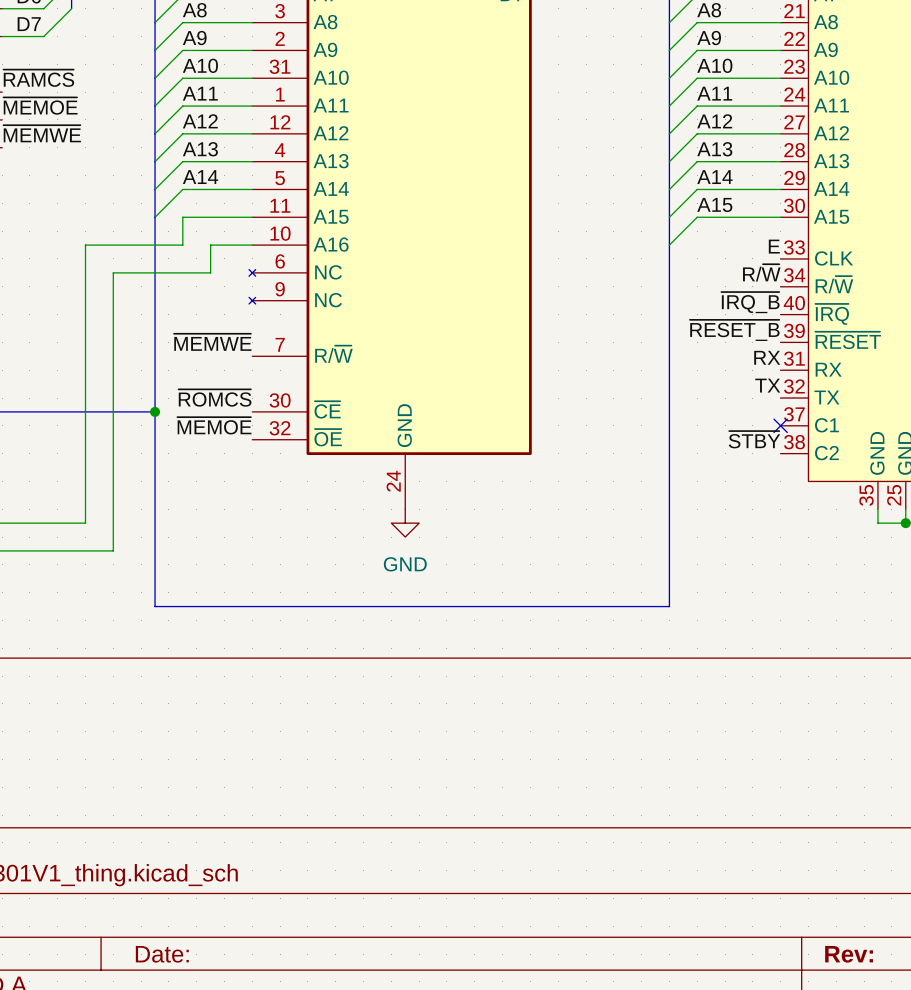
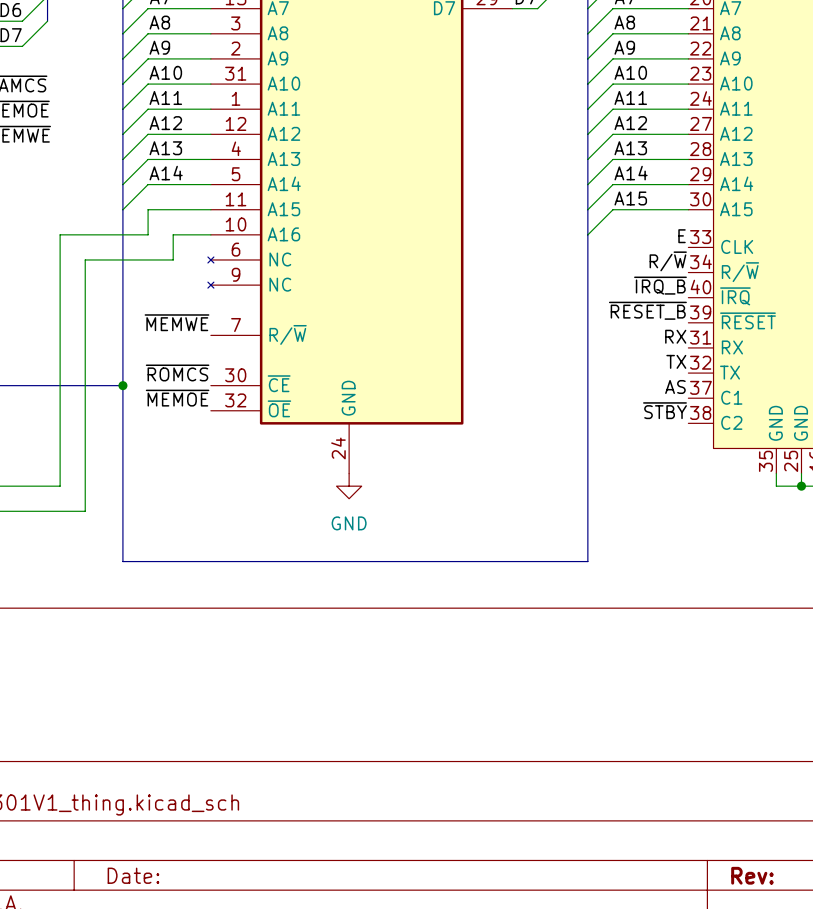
label: none -> AS (675, 386)
no-connect mark: (780, 425) -> none

